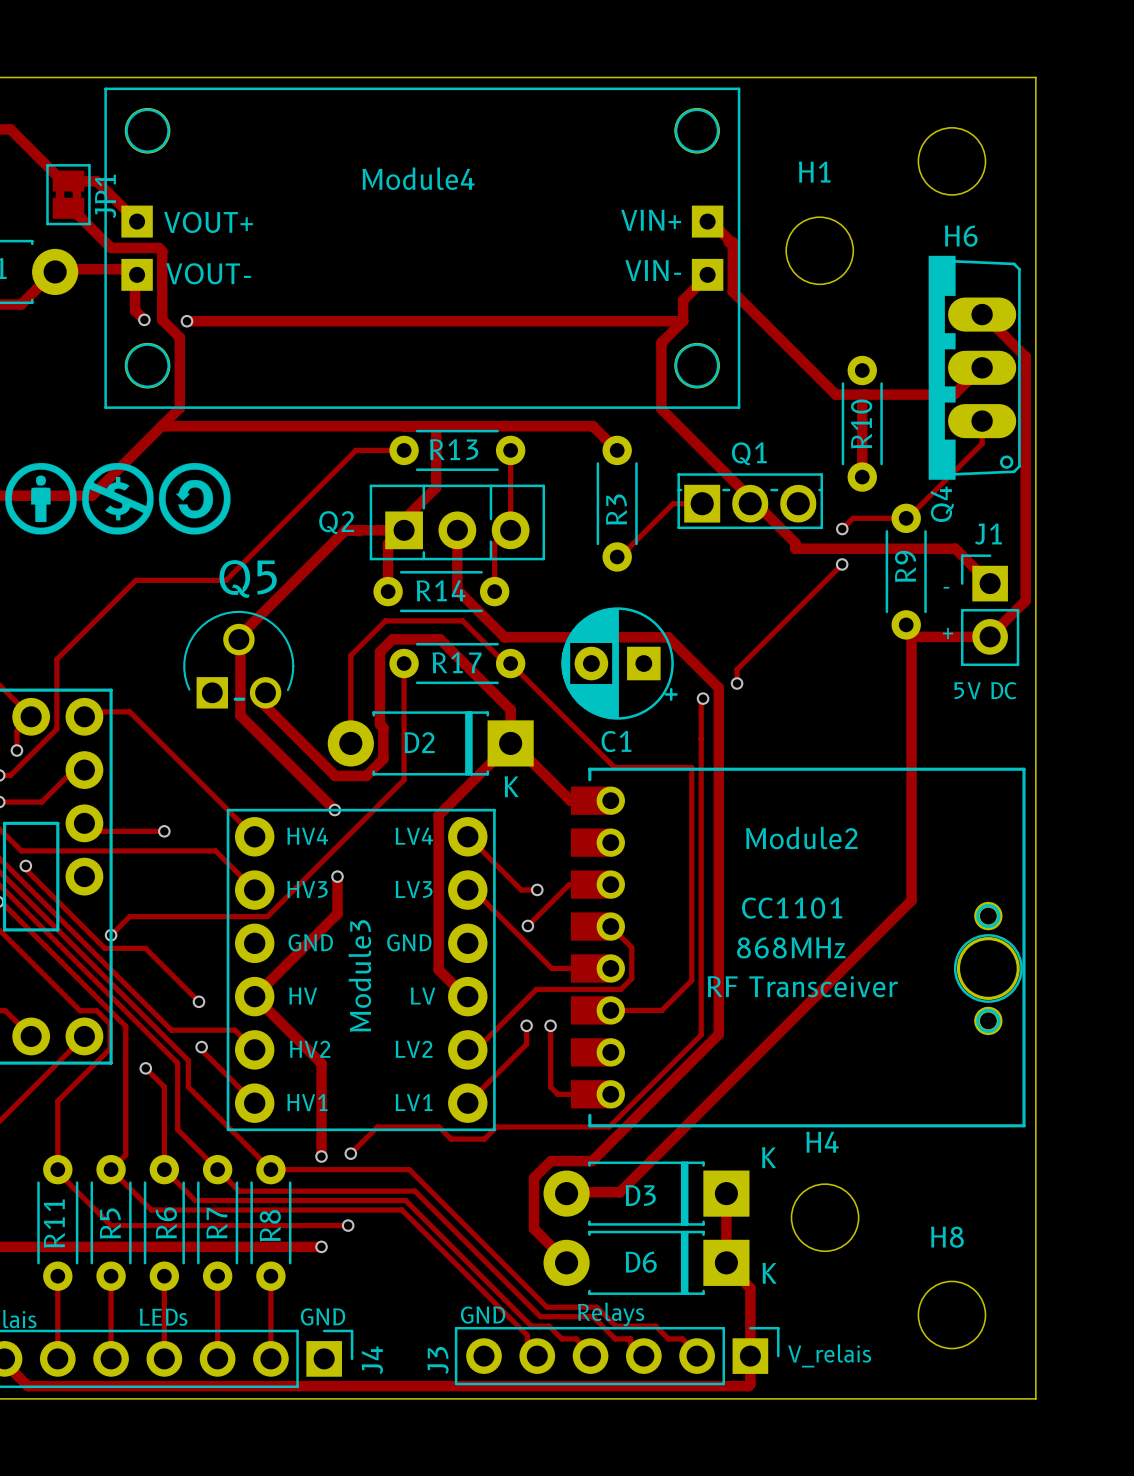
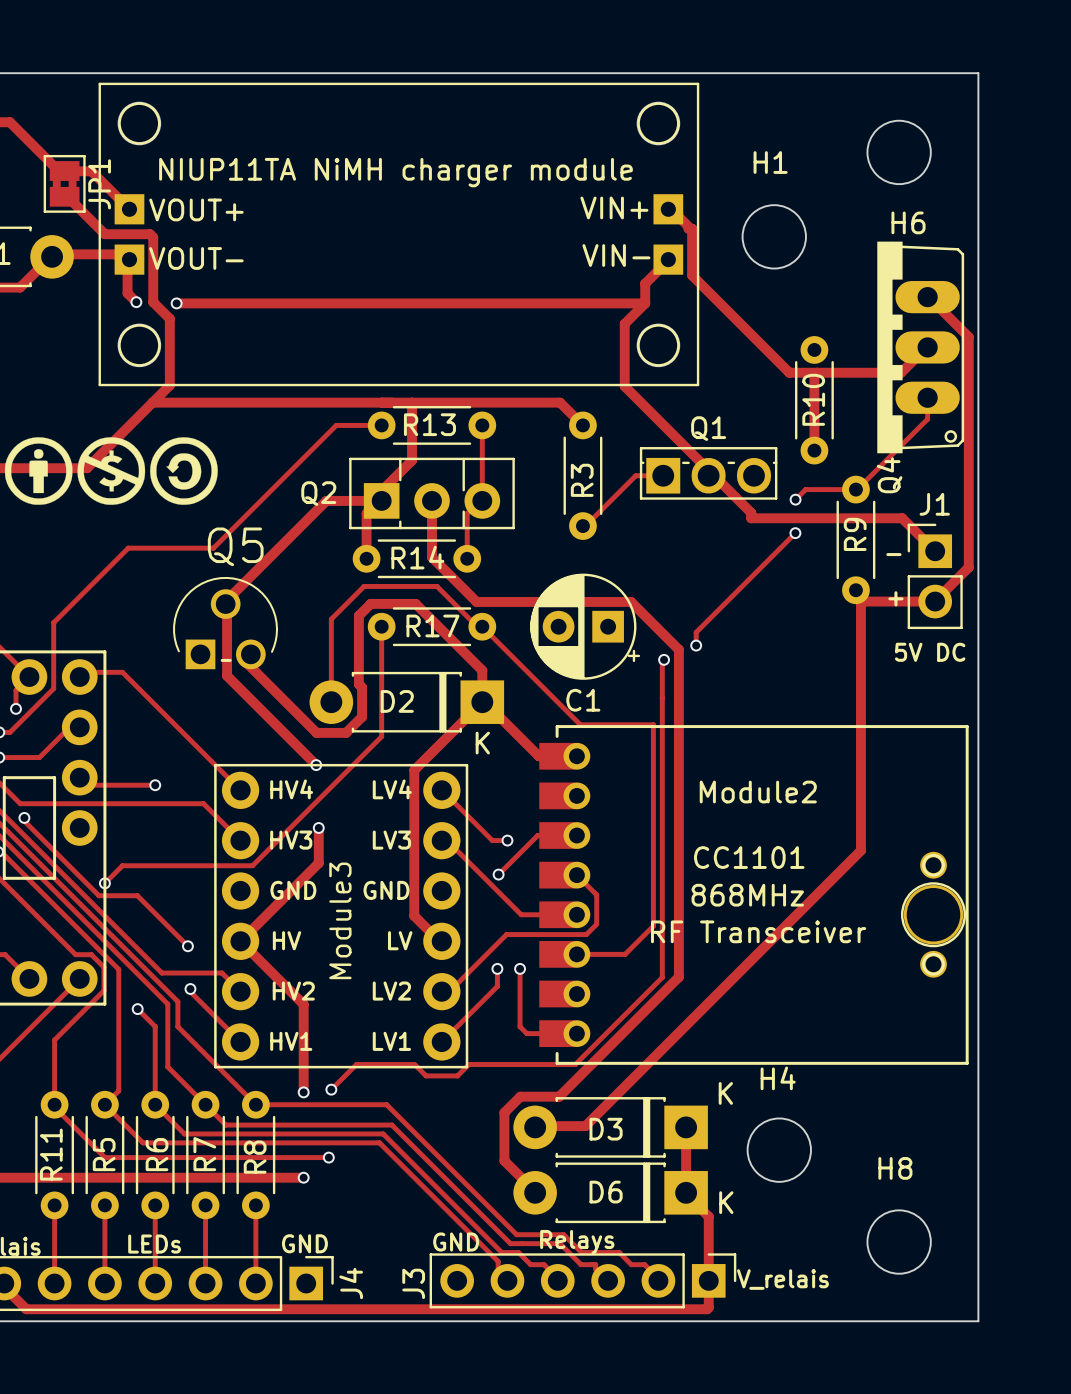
Module4 name: Module4 (418, 178) -> NIUP11TA NiMH charger module (395, 172)

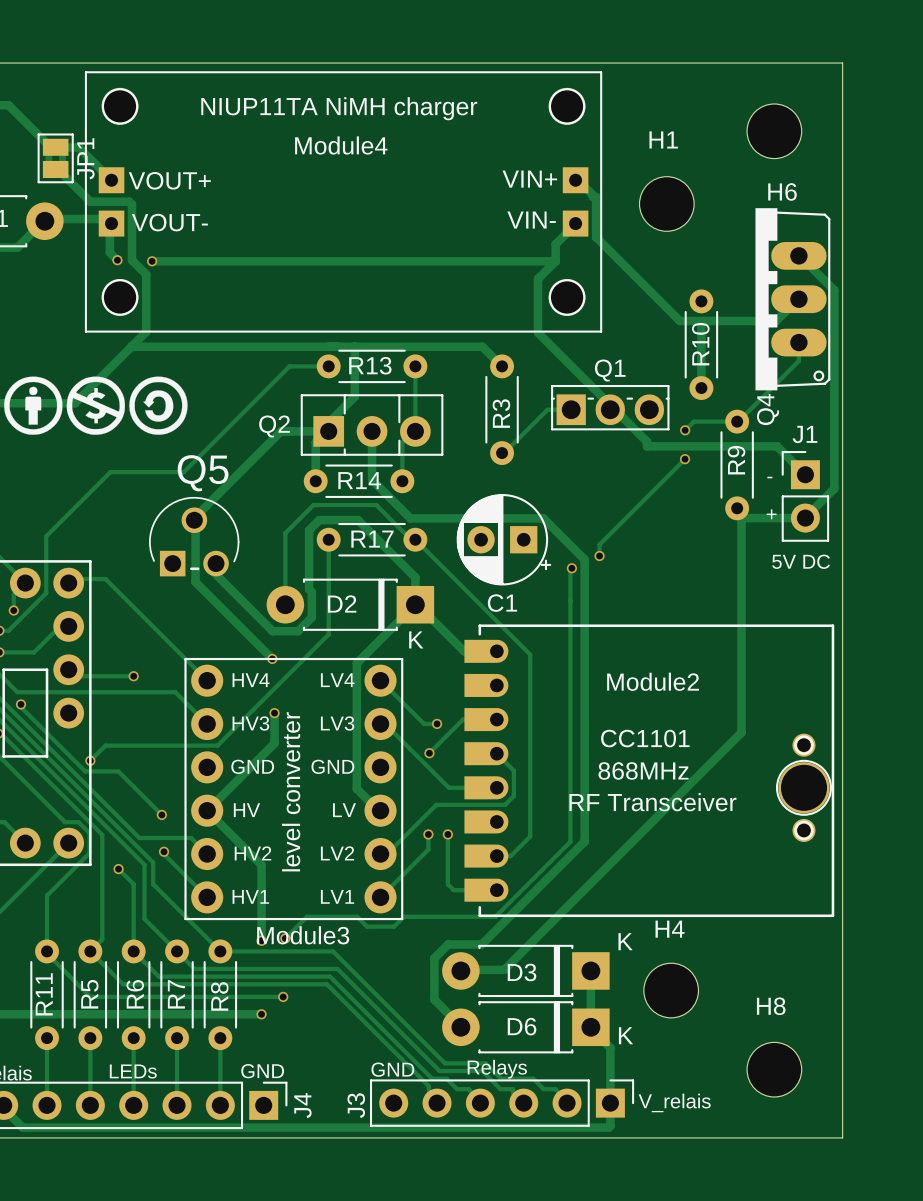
NIUP11TA NiMH charger module text: none -> NIUP11TA NiMH charger (339, 108)
NIUP11TA NiMH charger module name: NIUP11TA NiMH charger module (395, 172) -> Module4 (341, 145)
track: (580, 724) (653, 724) (653, 926) (625, 954) (576, 954) -> (499, 624) (530, 654) (530, 836) (510, 856) (496, 856)
Module3 text: none -> level converter (291, 791)
Module3 name rotation: 0° (340, 920) -> 90° clockwise (303, 935)
Module3 name position: Module3 (340, 920) -> Module3 (303, 935)

